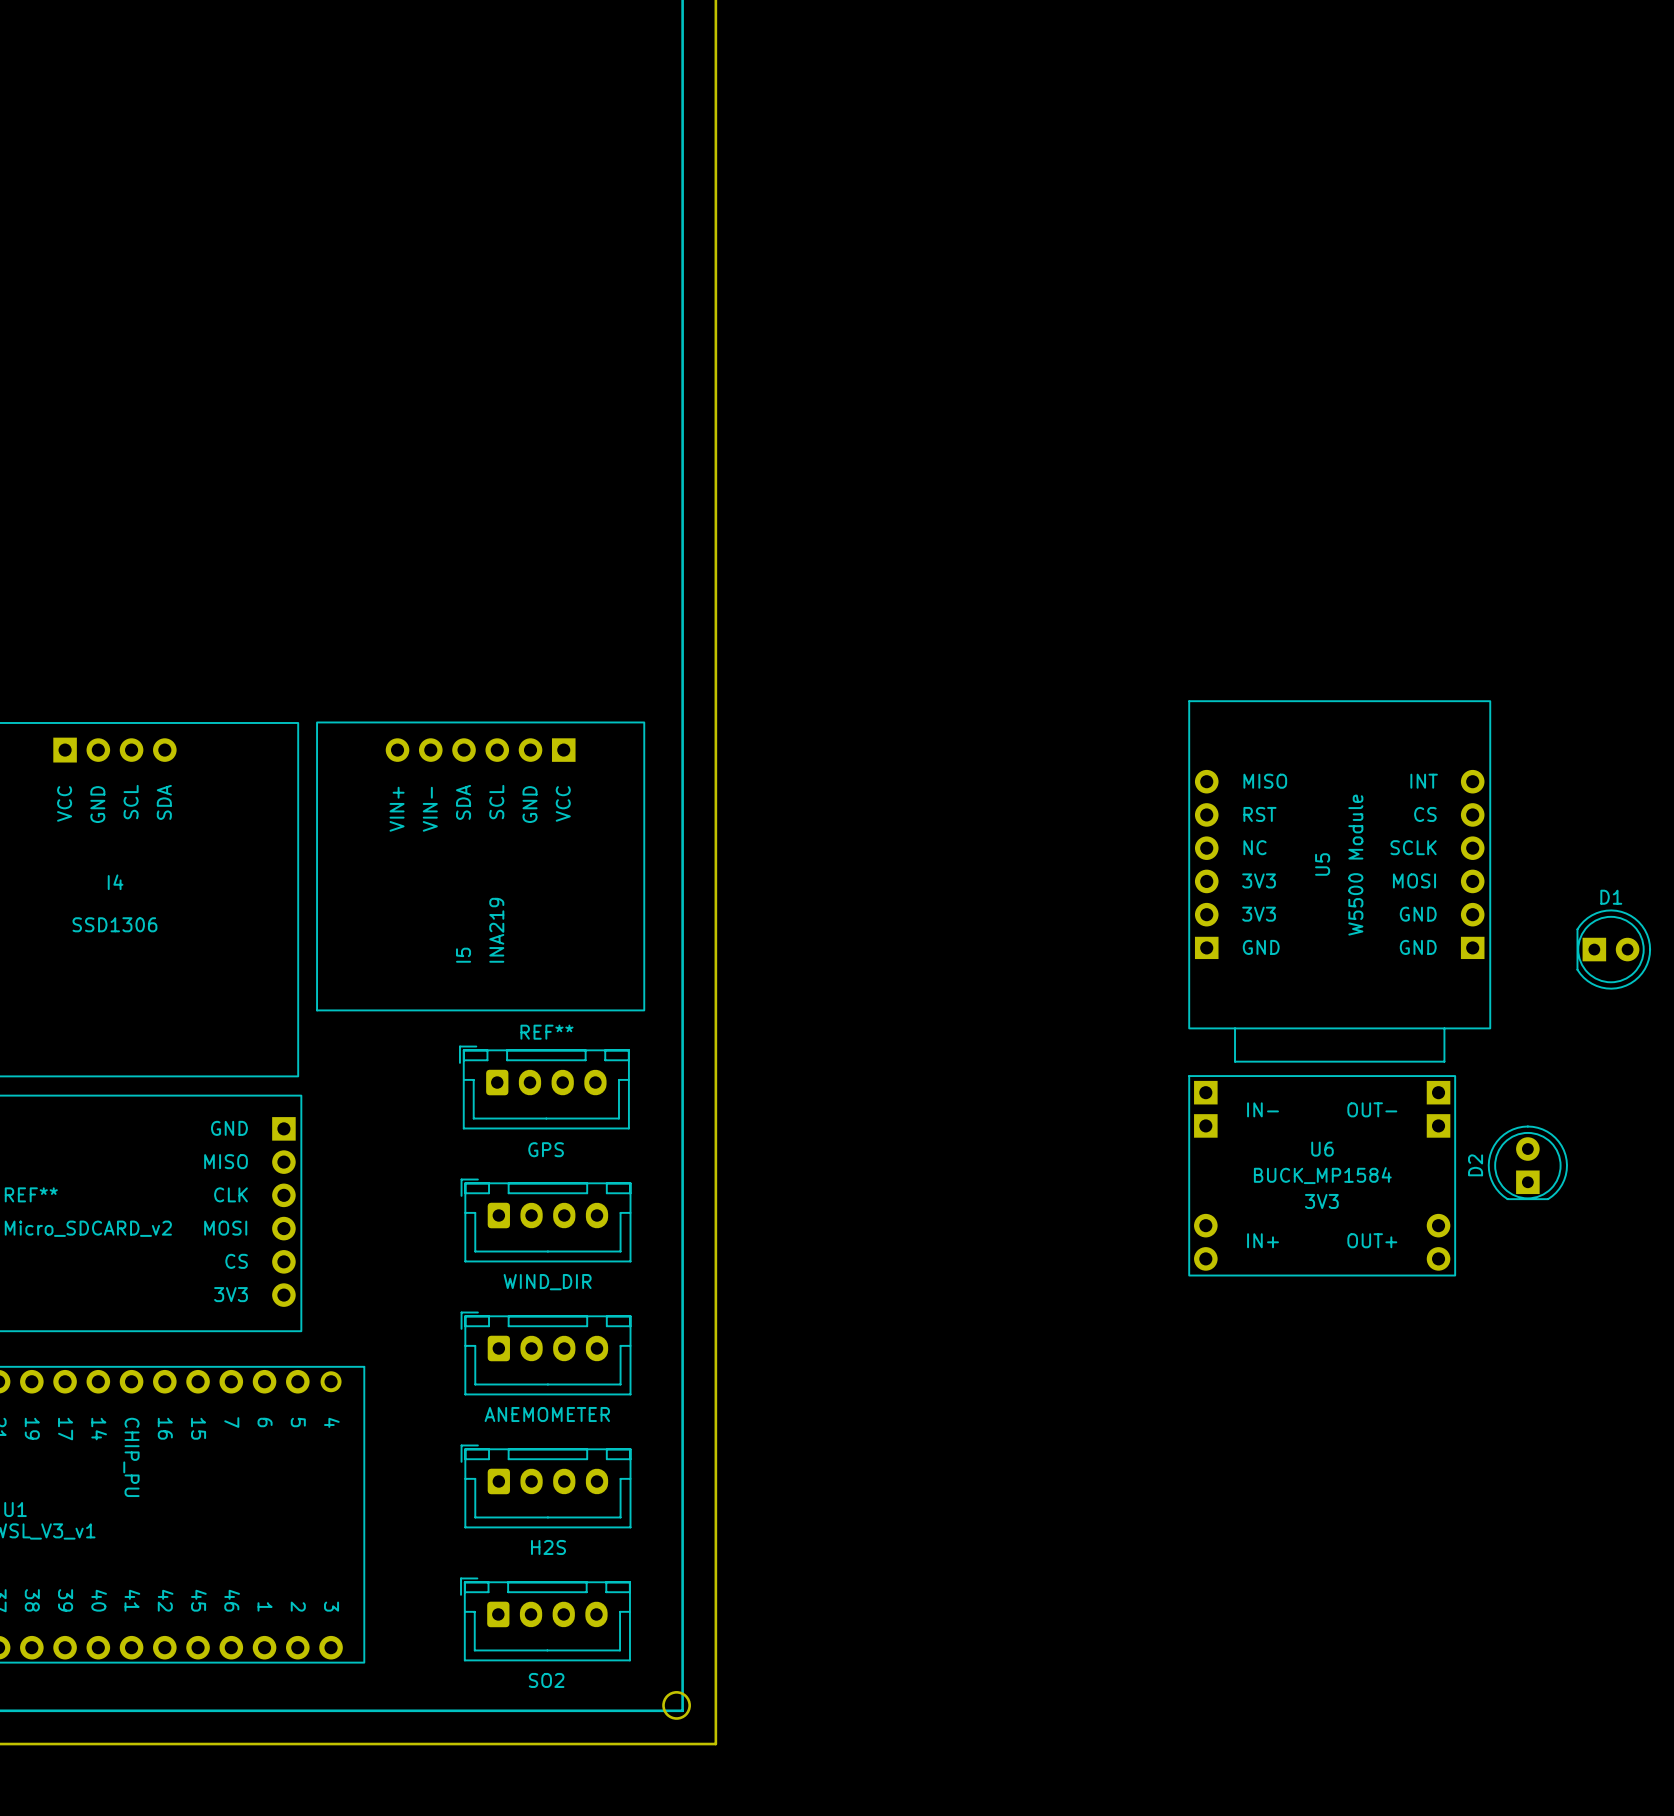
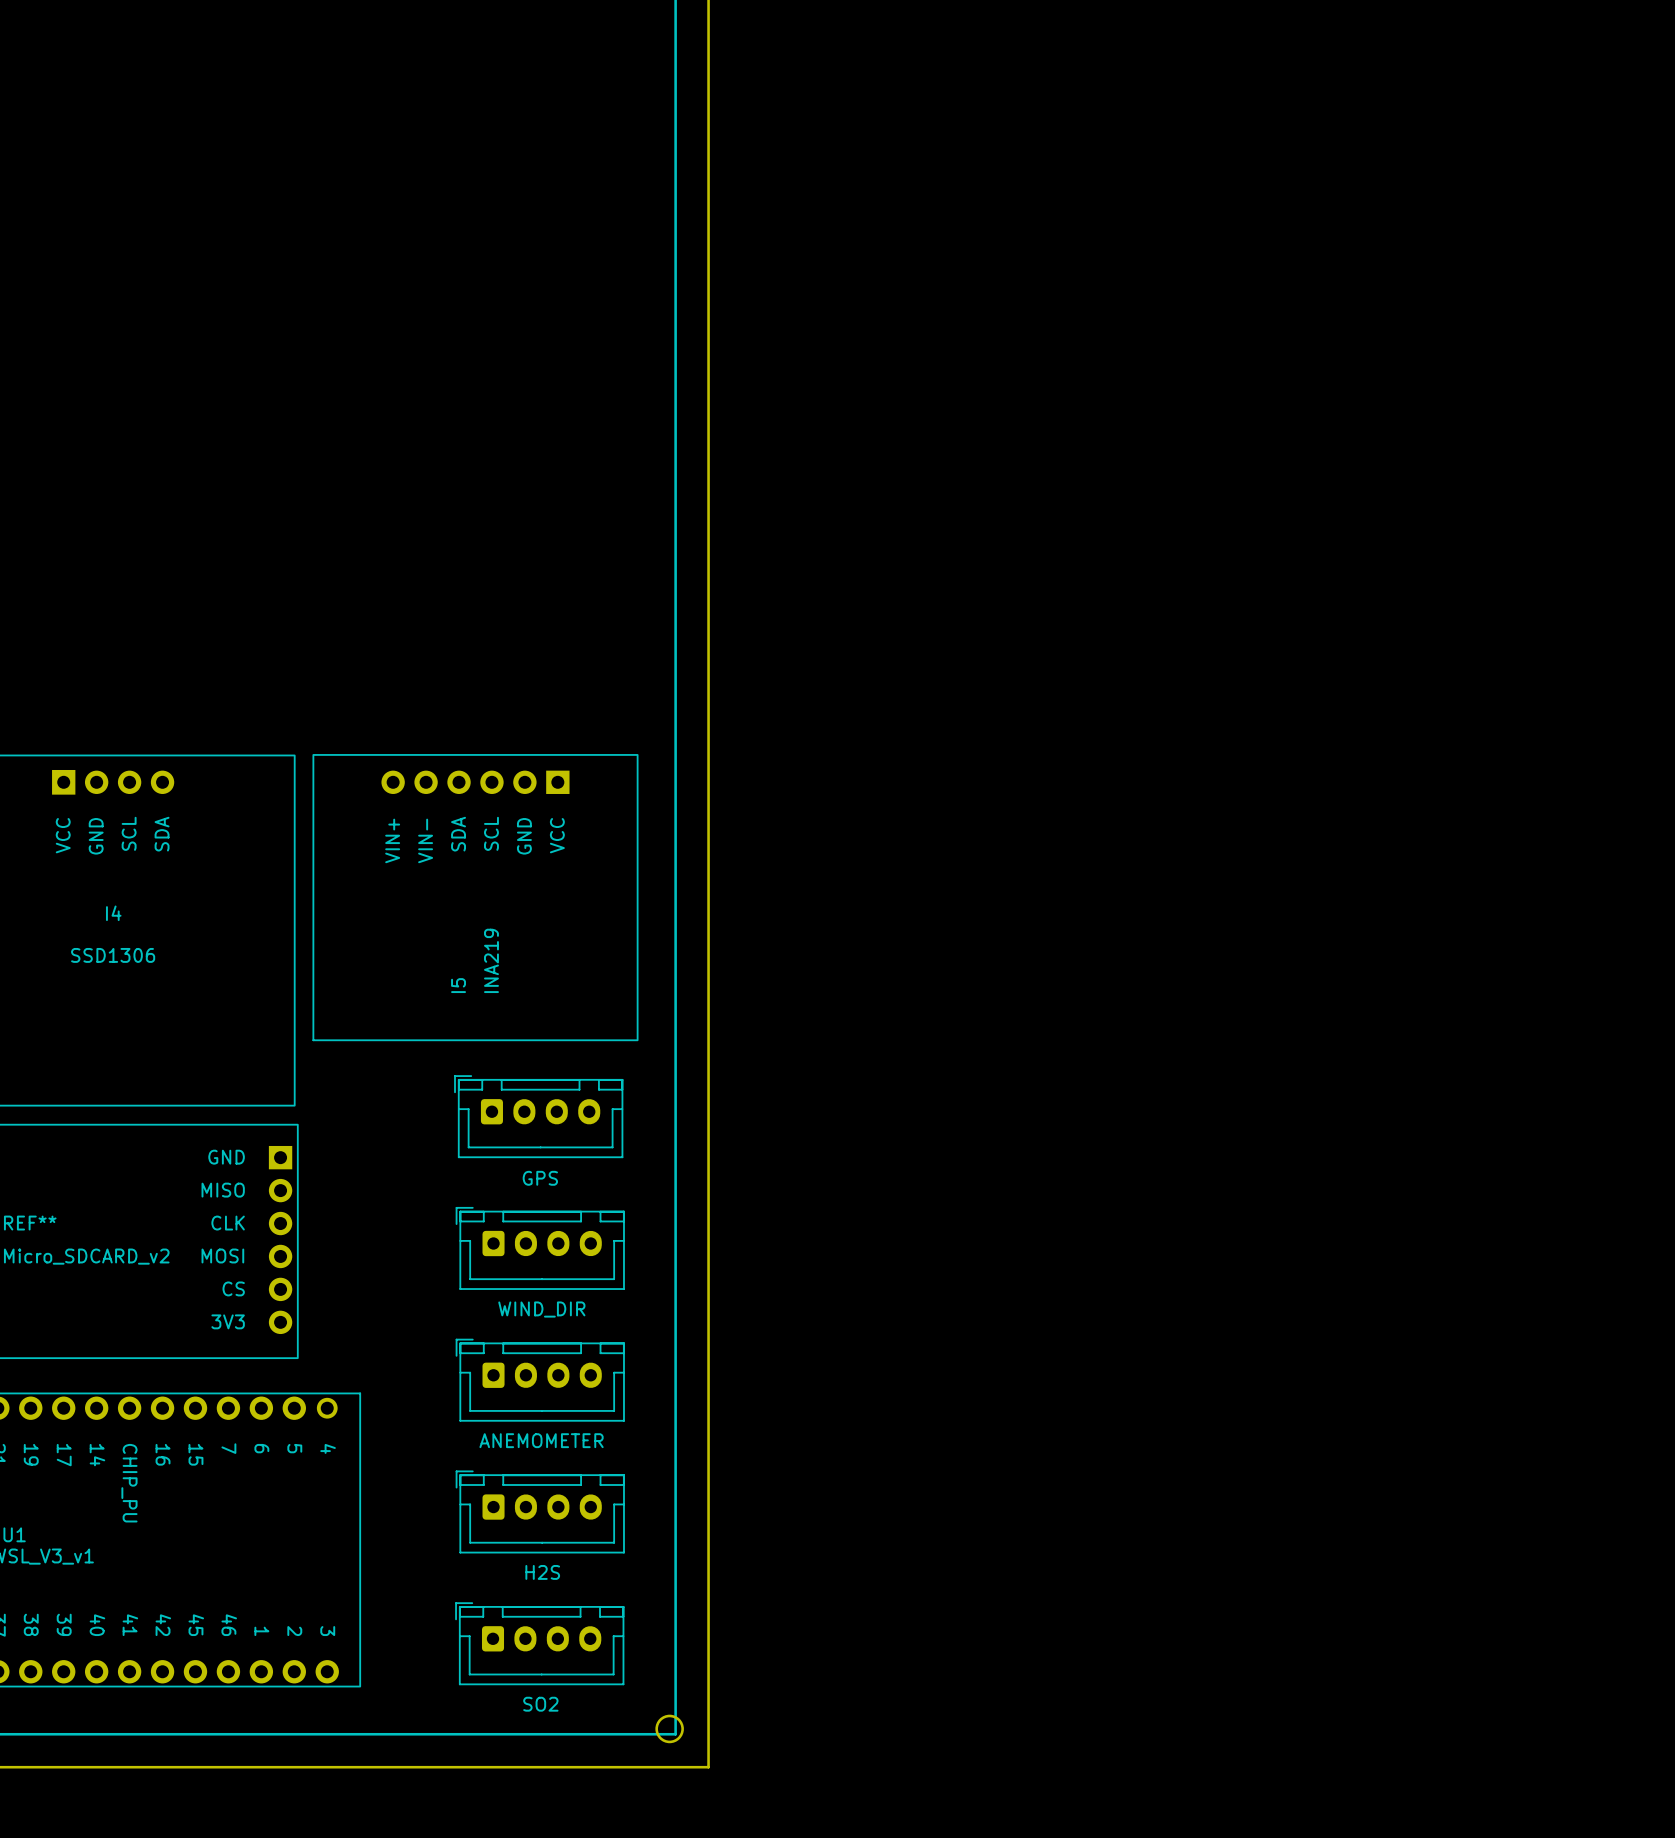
U5: (1339, 881) -> none
D1: (1613, 949) -> none
part text: REF** (546, 1032) -> none
D2: (1527, 1162) -> none
U6: (1322, 1175) -> none

